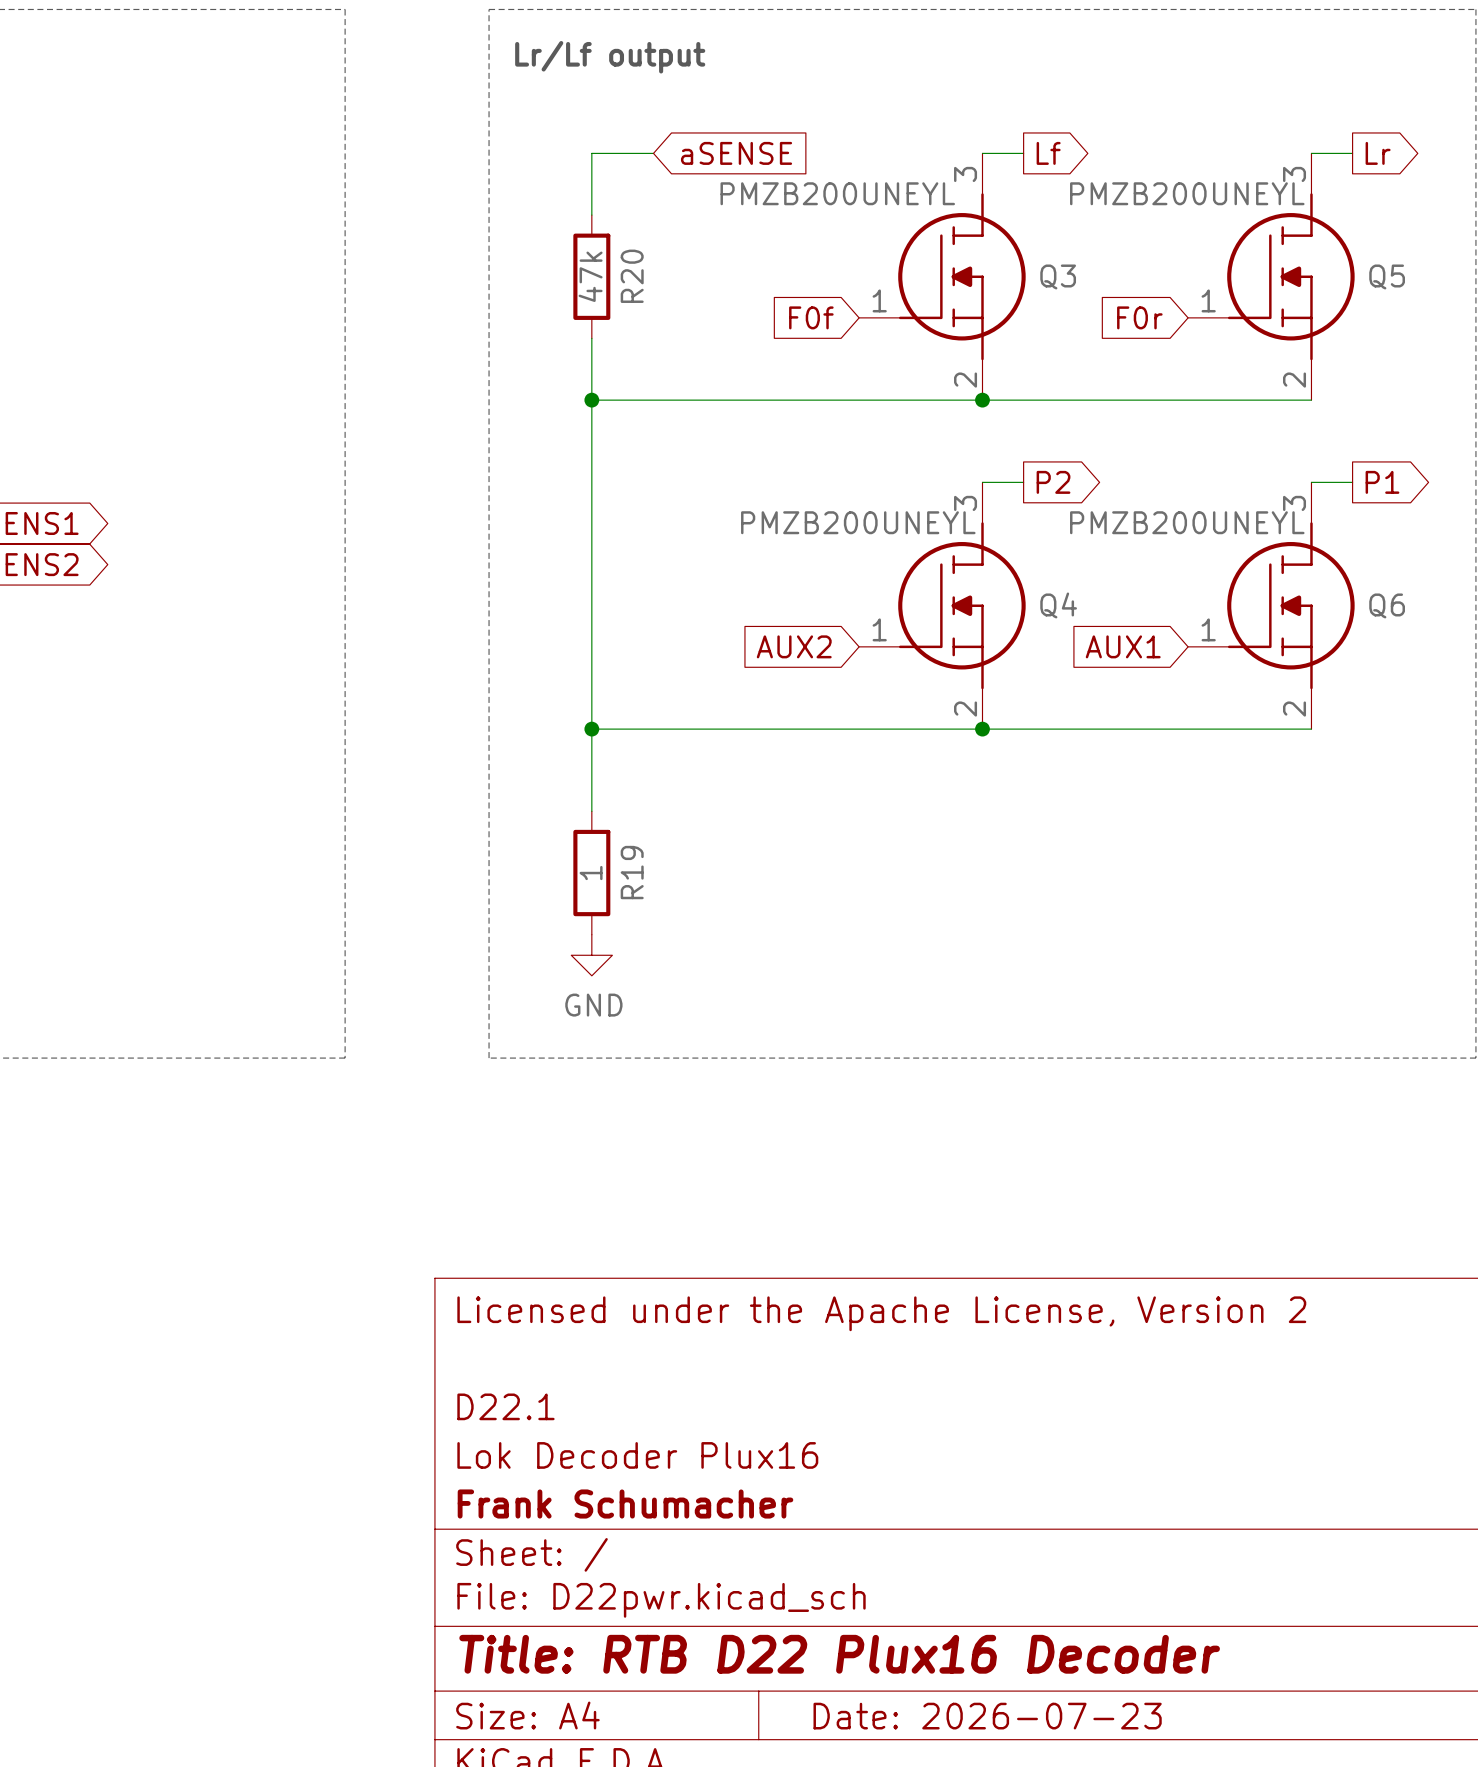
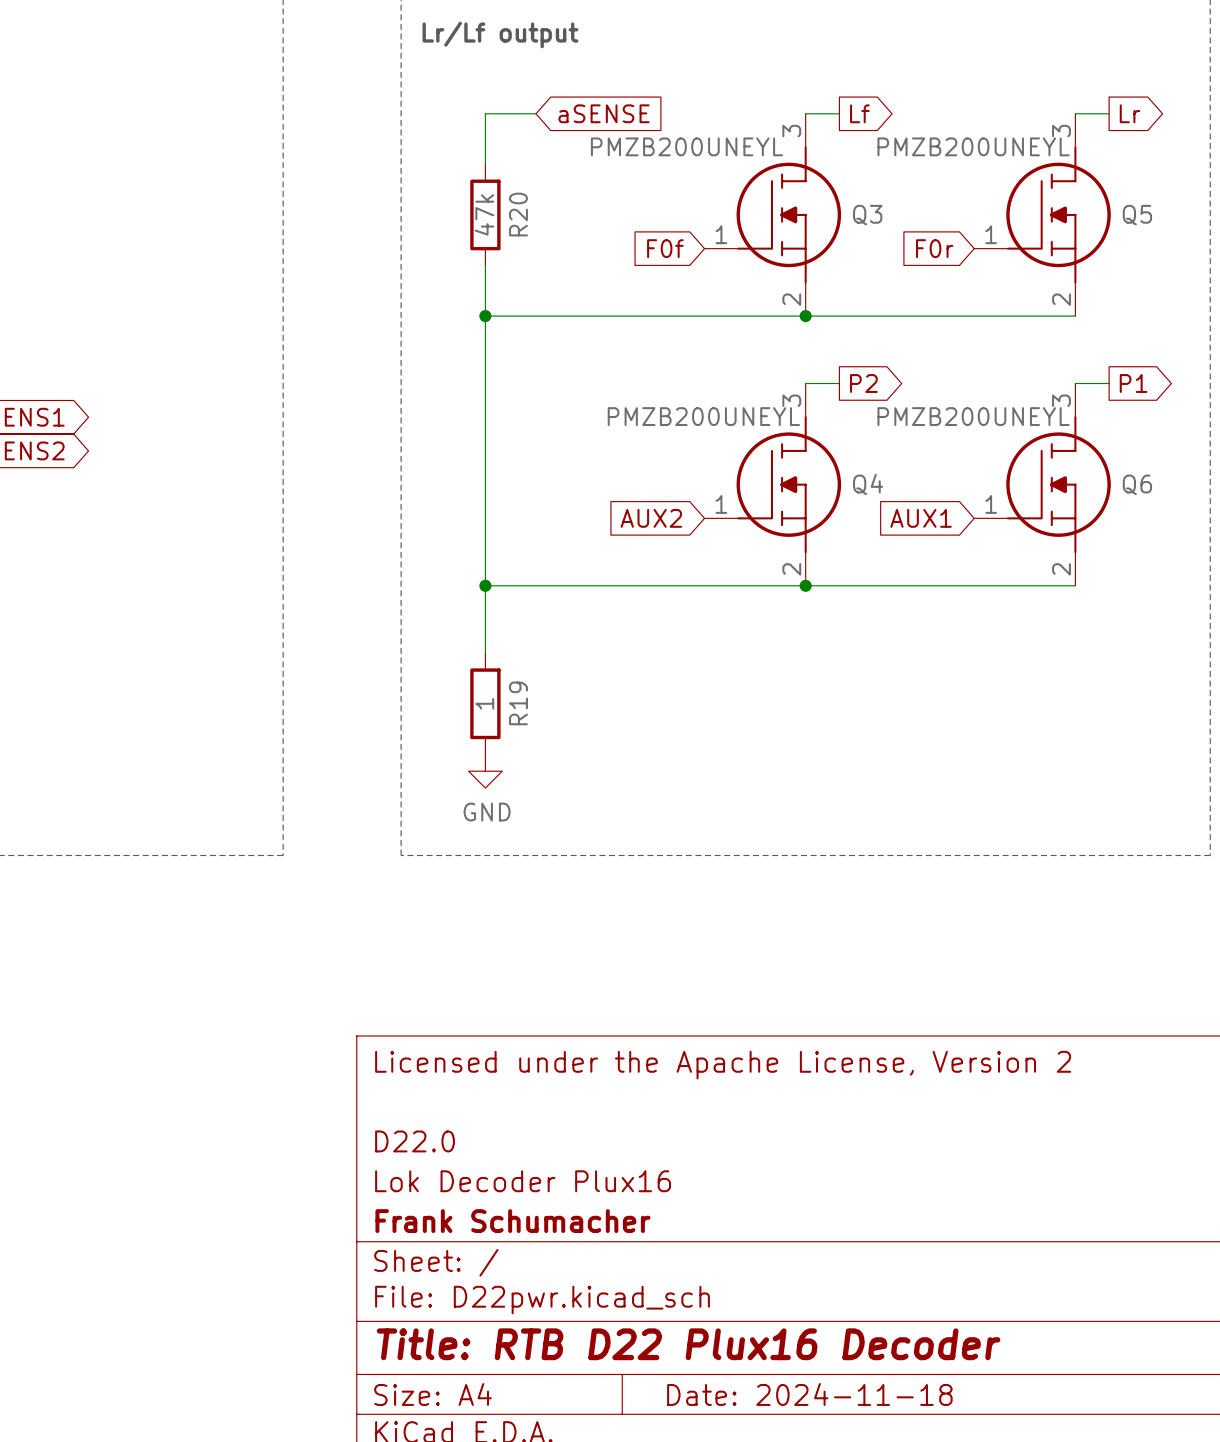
title block: D22.1 (505, 1406) -> D22.0 (415, 1141)
title block: Date: 2026-07-23 (987, 1716) -> Date: 2024-11-18 (809, 1394)

